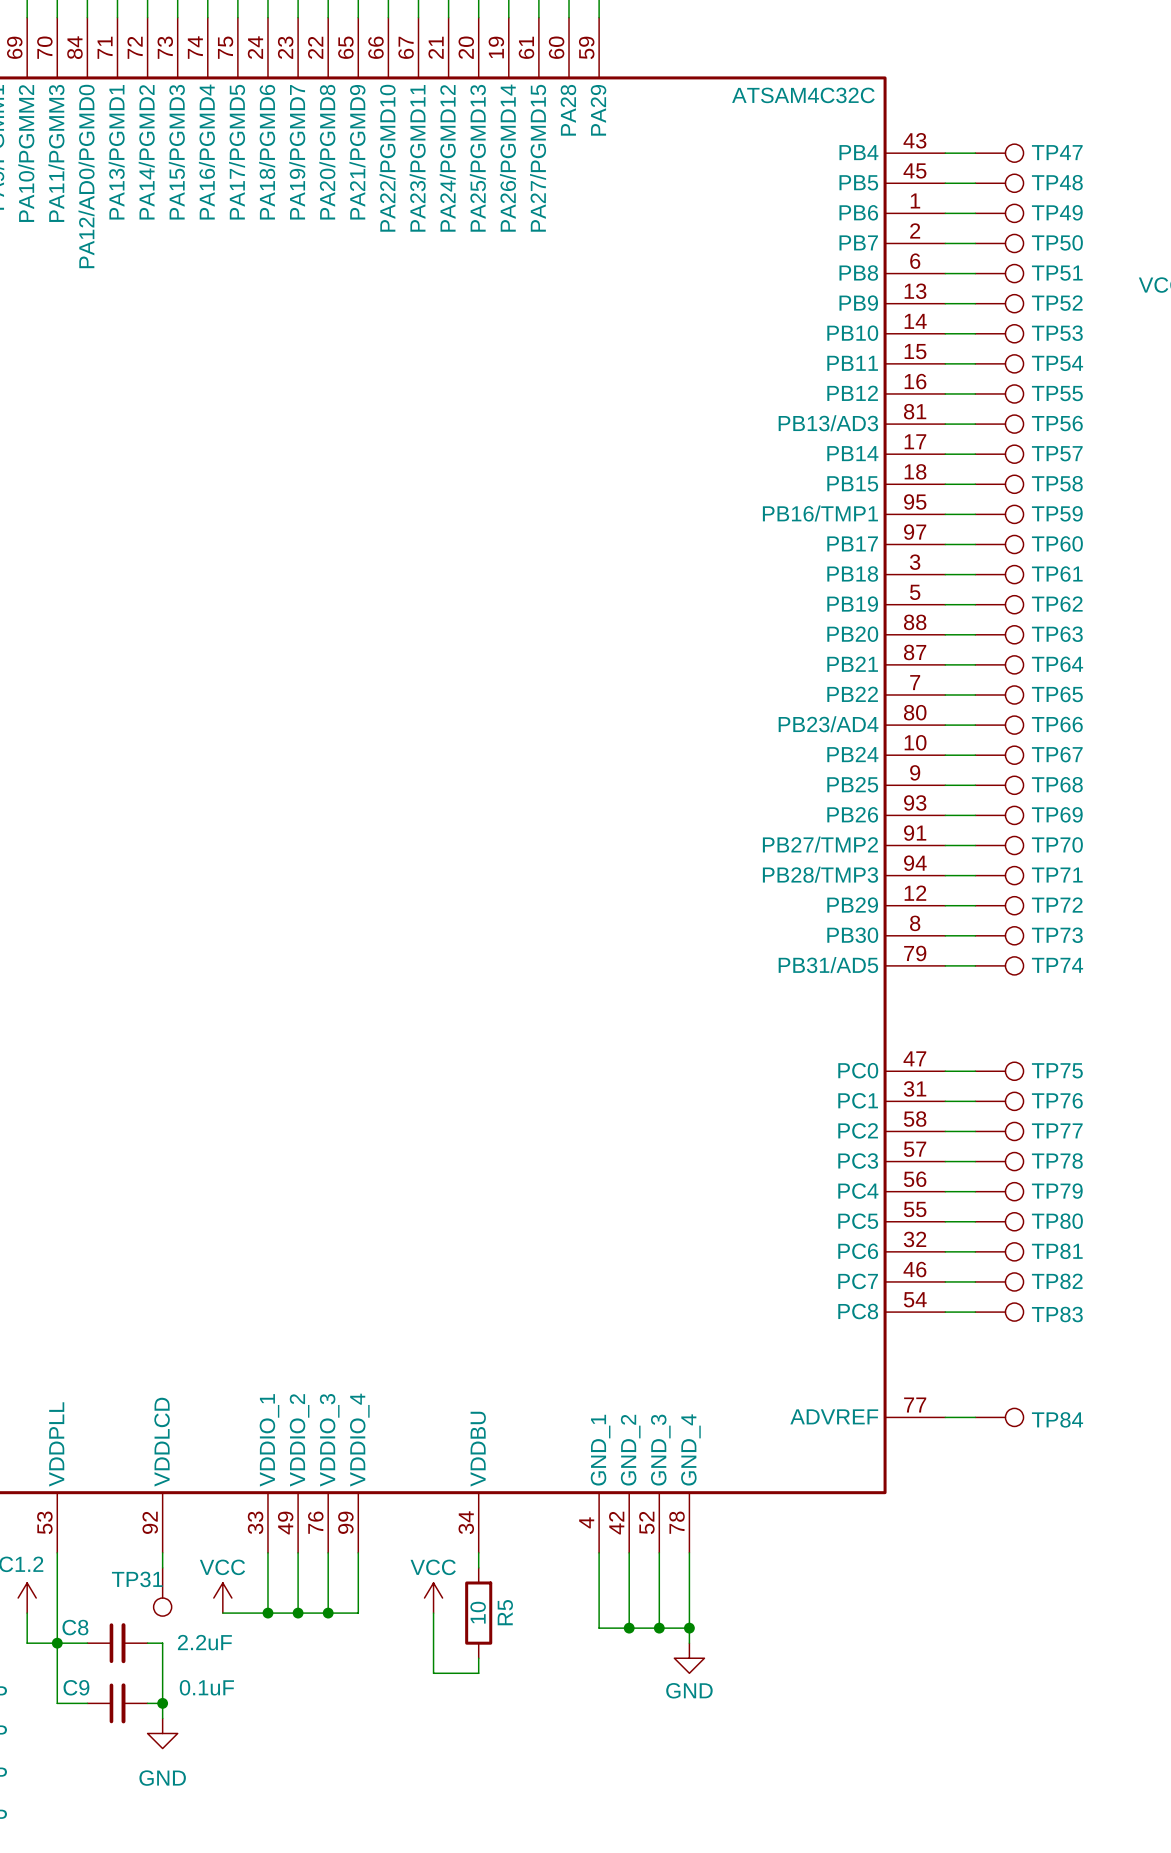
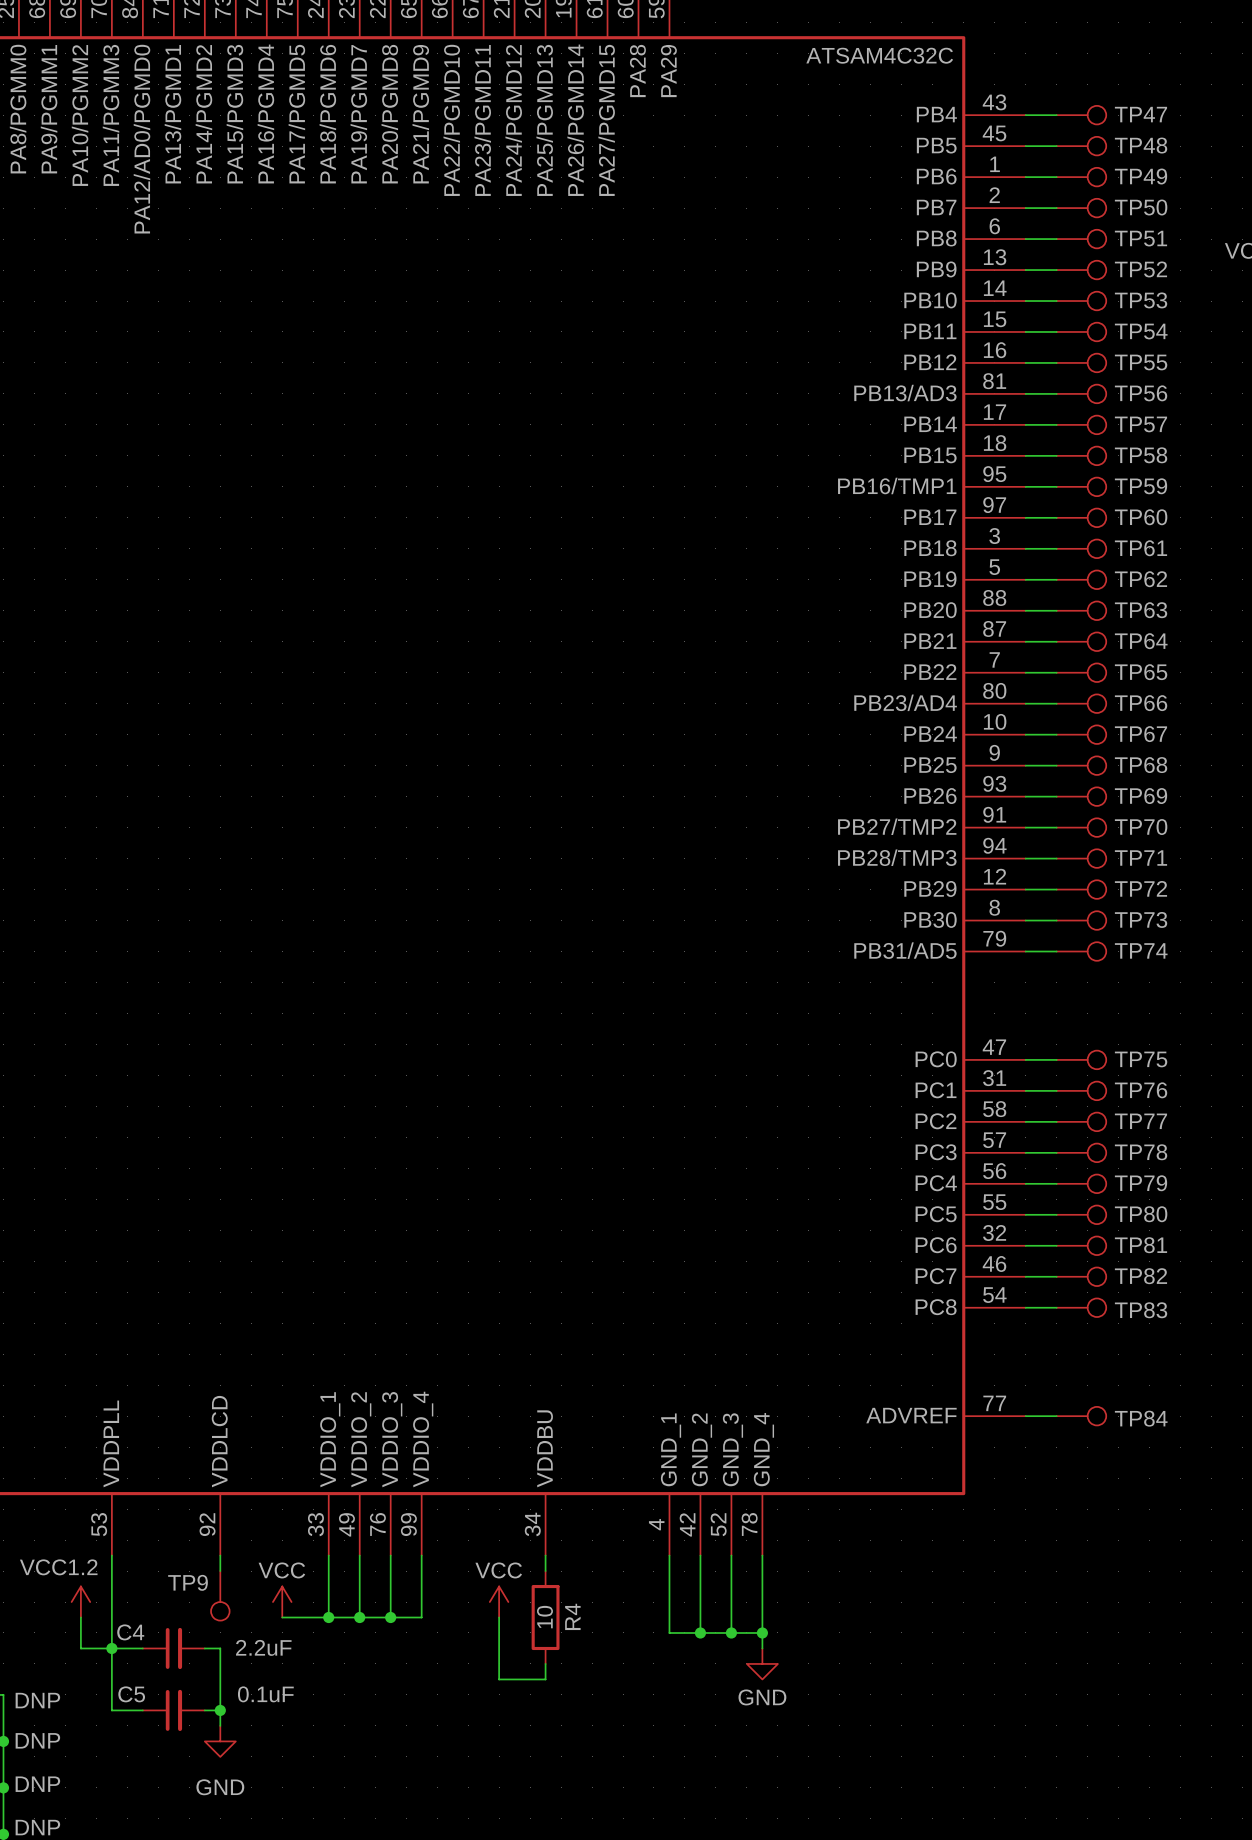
TP31 name: TP31 (137, 1579) -> TP9 (188, 1582)
R5 name: R5 (505, 1612) -> R4 (572, 1616)
C8 name: C8 (75, 1627) -> C4 (130, 1632)
C9 name: C9 (76, 1687) -> C5 (131, 1694)

